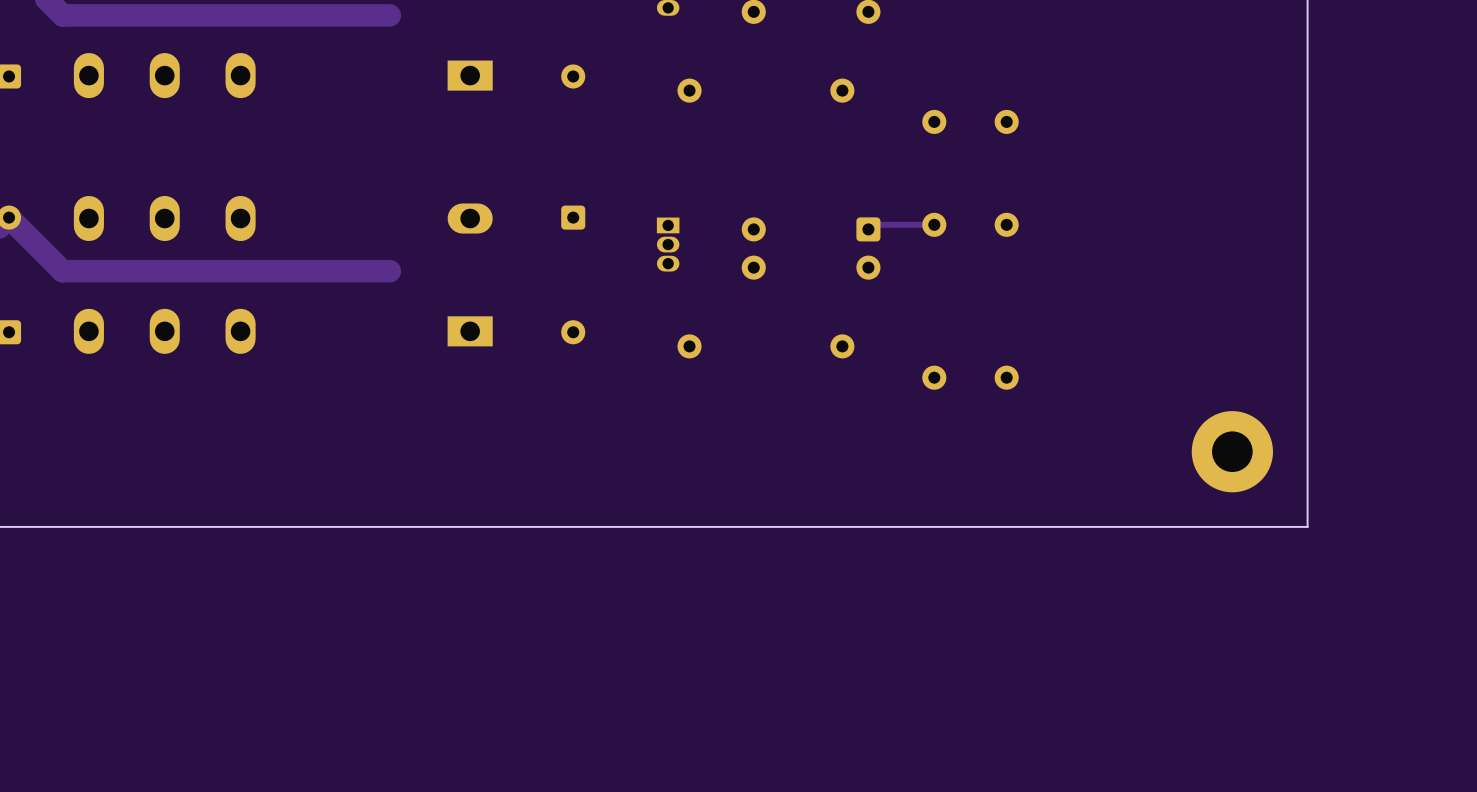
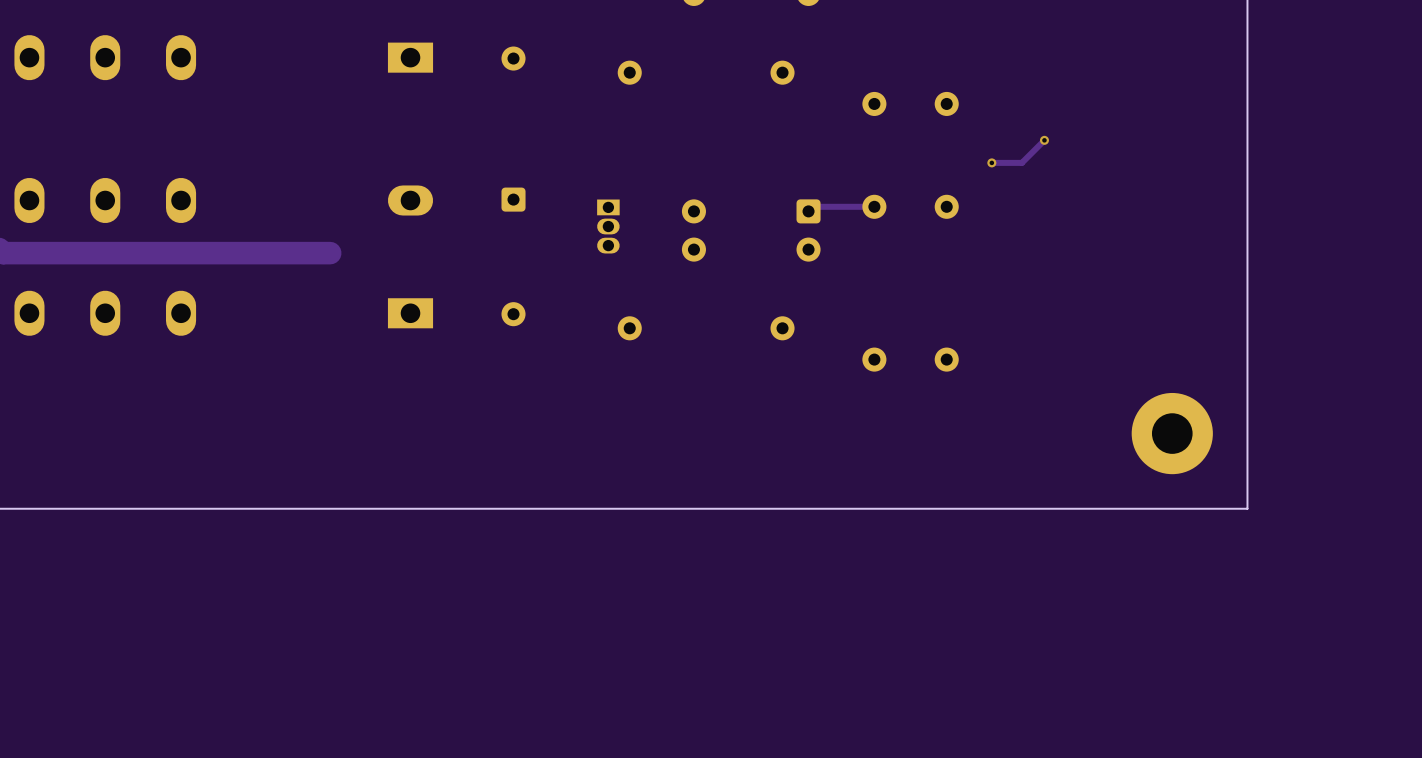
track: none -> (1044, 140) (1021, 162) (991, 162)
via: none -> (1044, 140)
via: none -> (991, 162)

